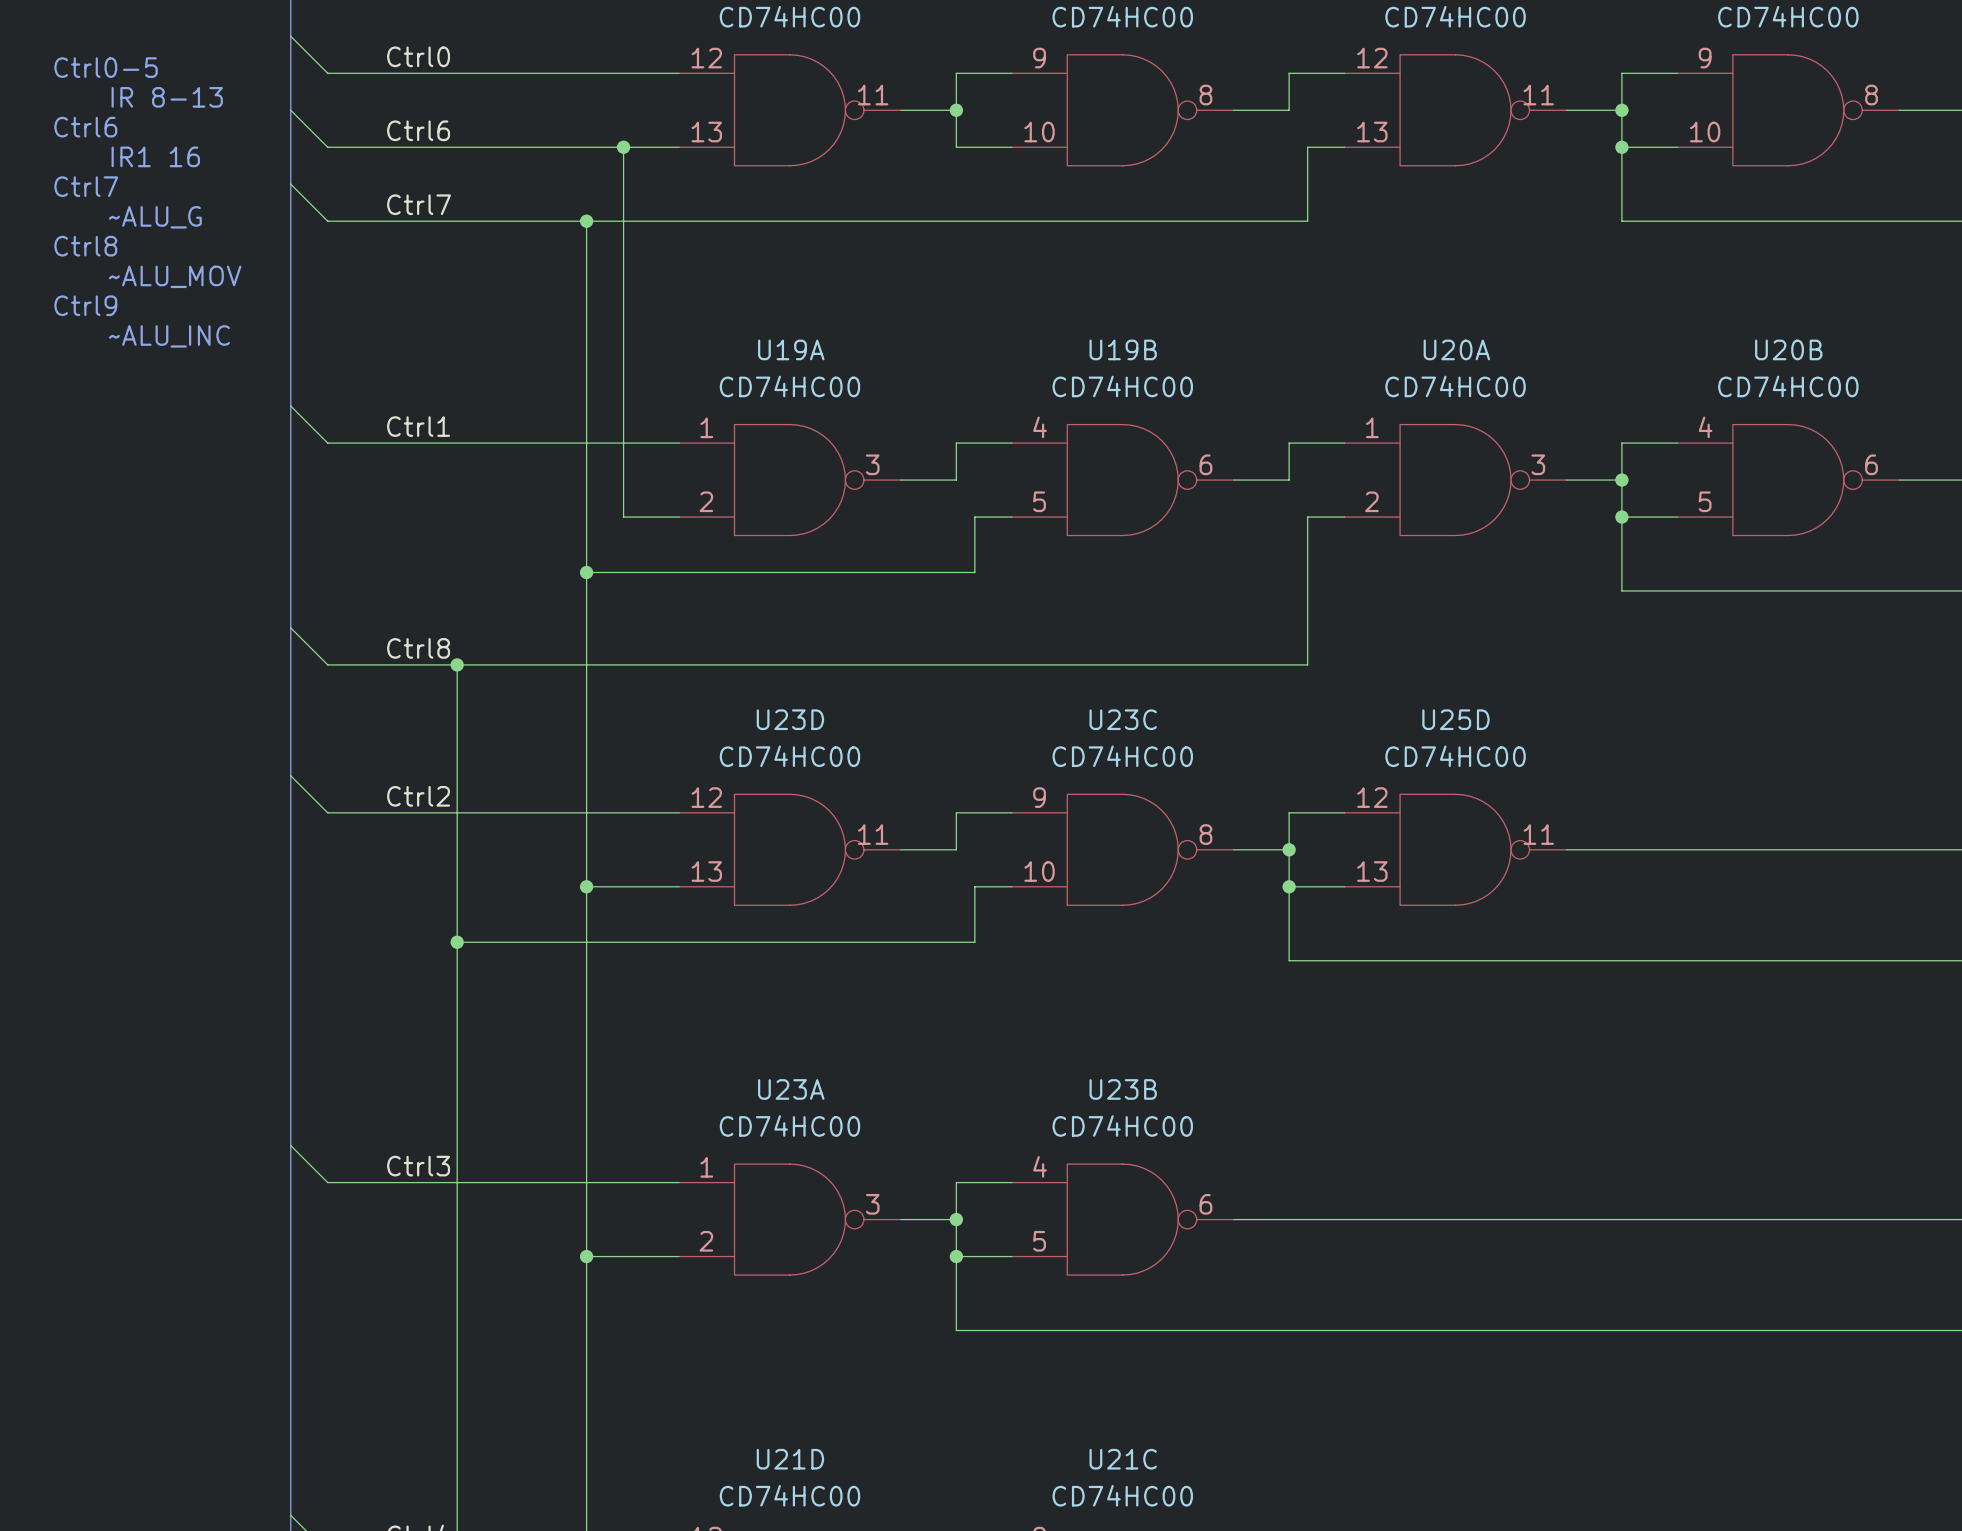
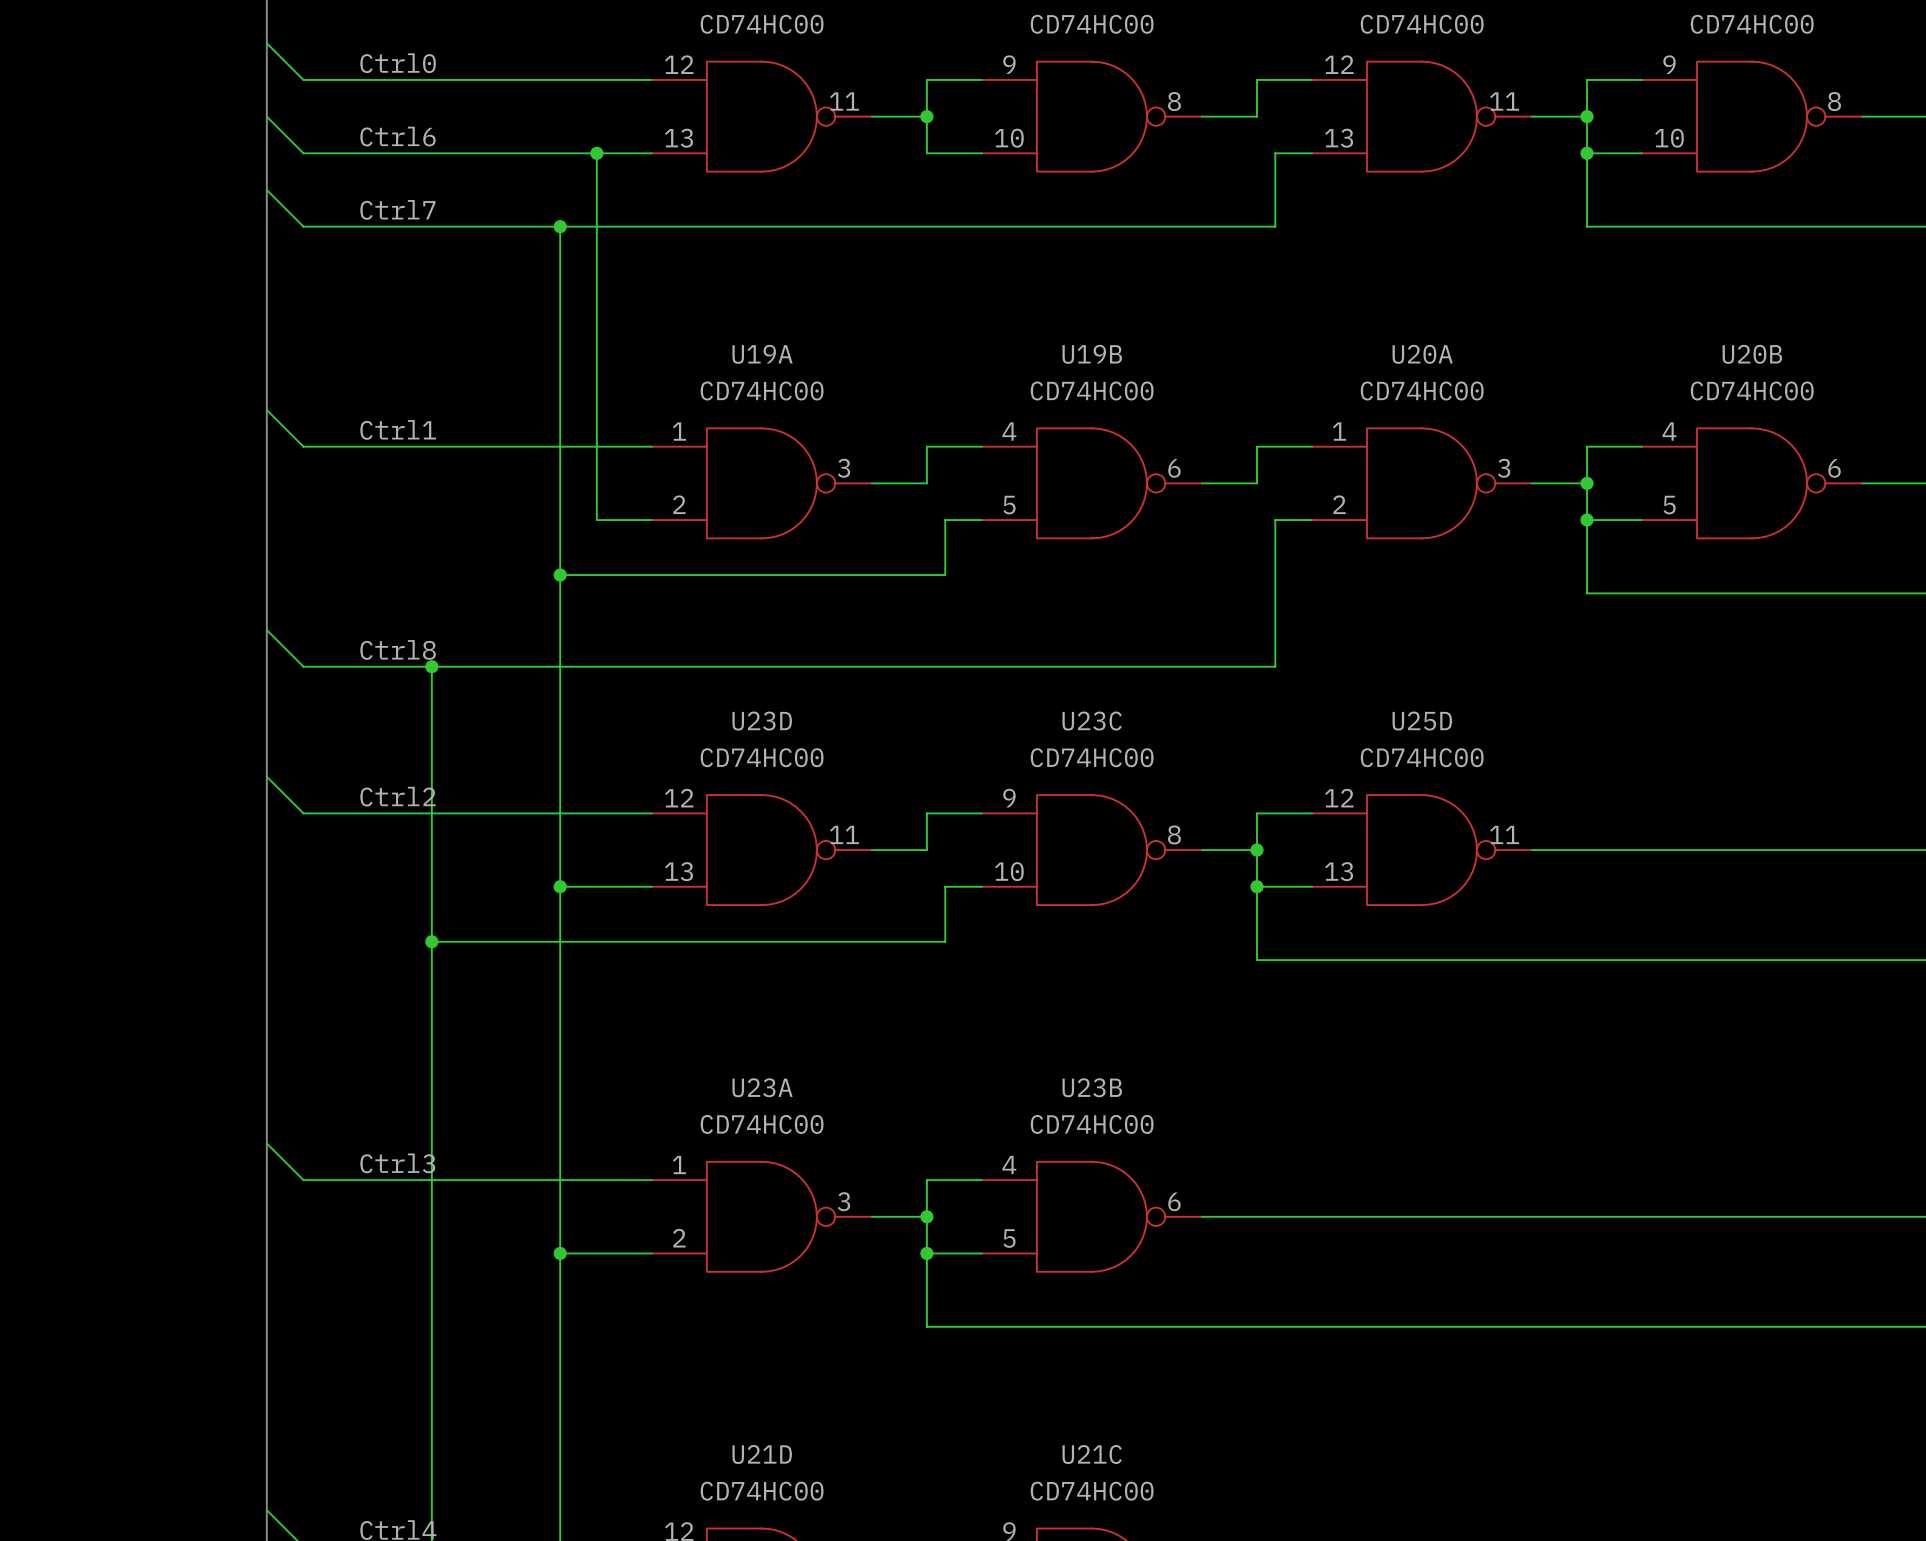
text: Ctrl0-5 (106, 67) -> none
text: IR 8-13 (167, 97) -> none
text: Ctrl6 (85, 127) -> none
text: IR1 16 (155, 156) -> none
text: Ctrl7 (86, 186) -> none
text: ~ALU_G (155, 217) -> none
text: Ctrl8 (85, 246) -> none
text: ~ALU_MOV (175, 276) -> none
text: Ctrl9 (85, 305) -> none
text: ~ALU_INC (169, 336) -> none

